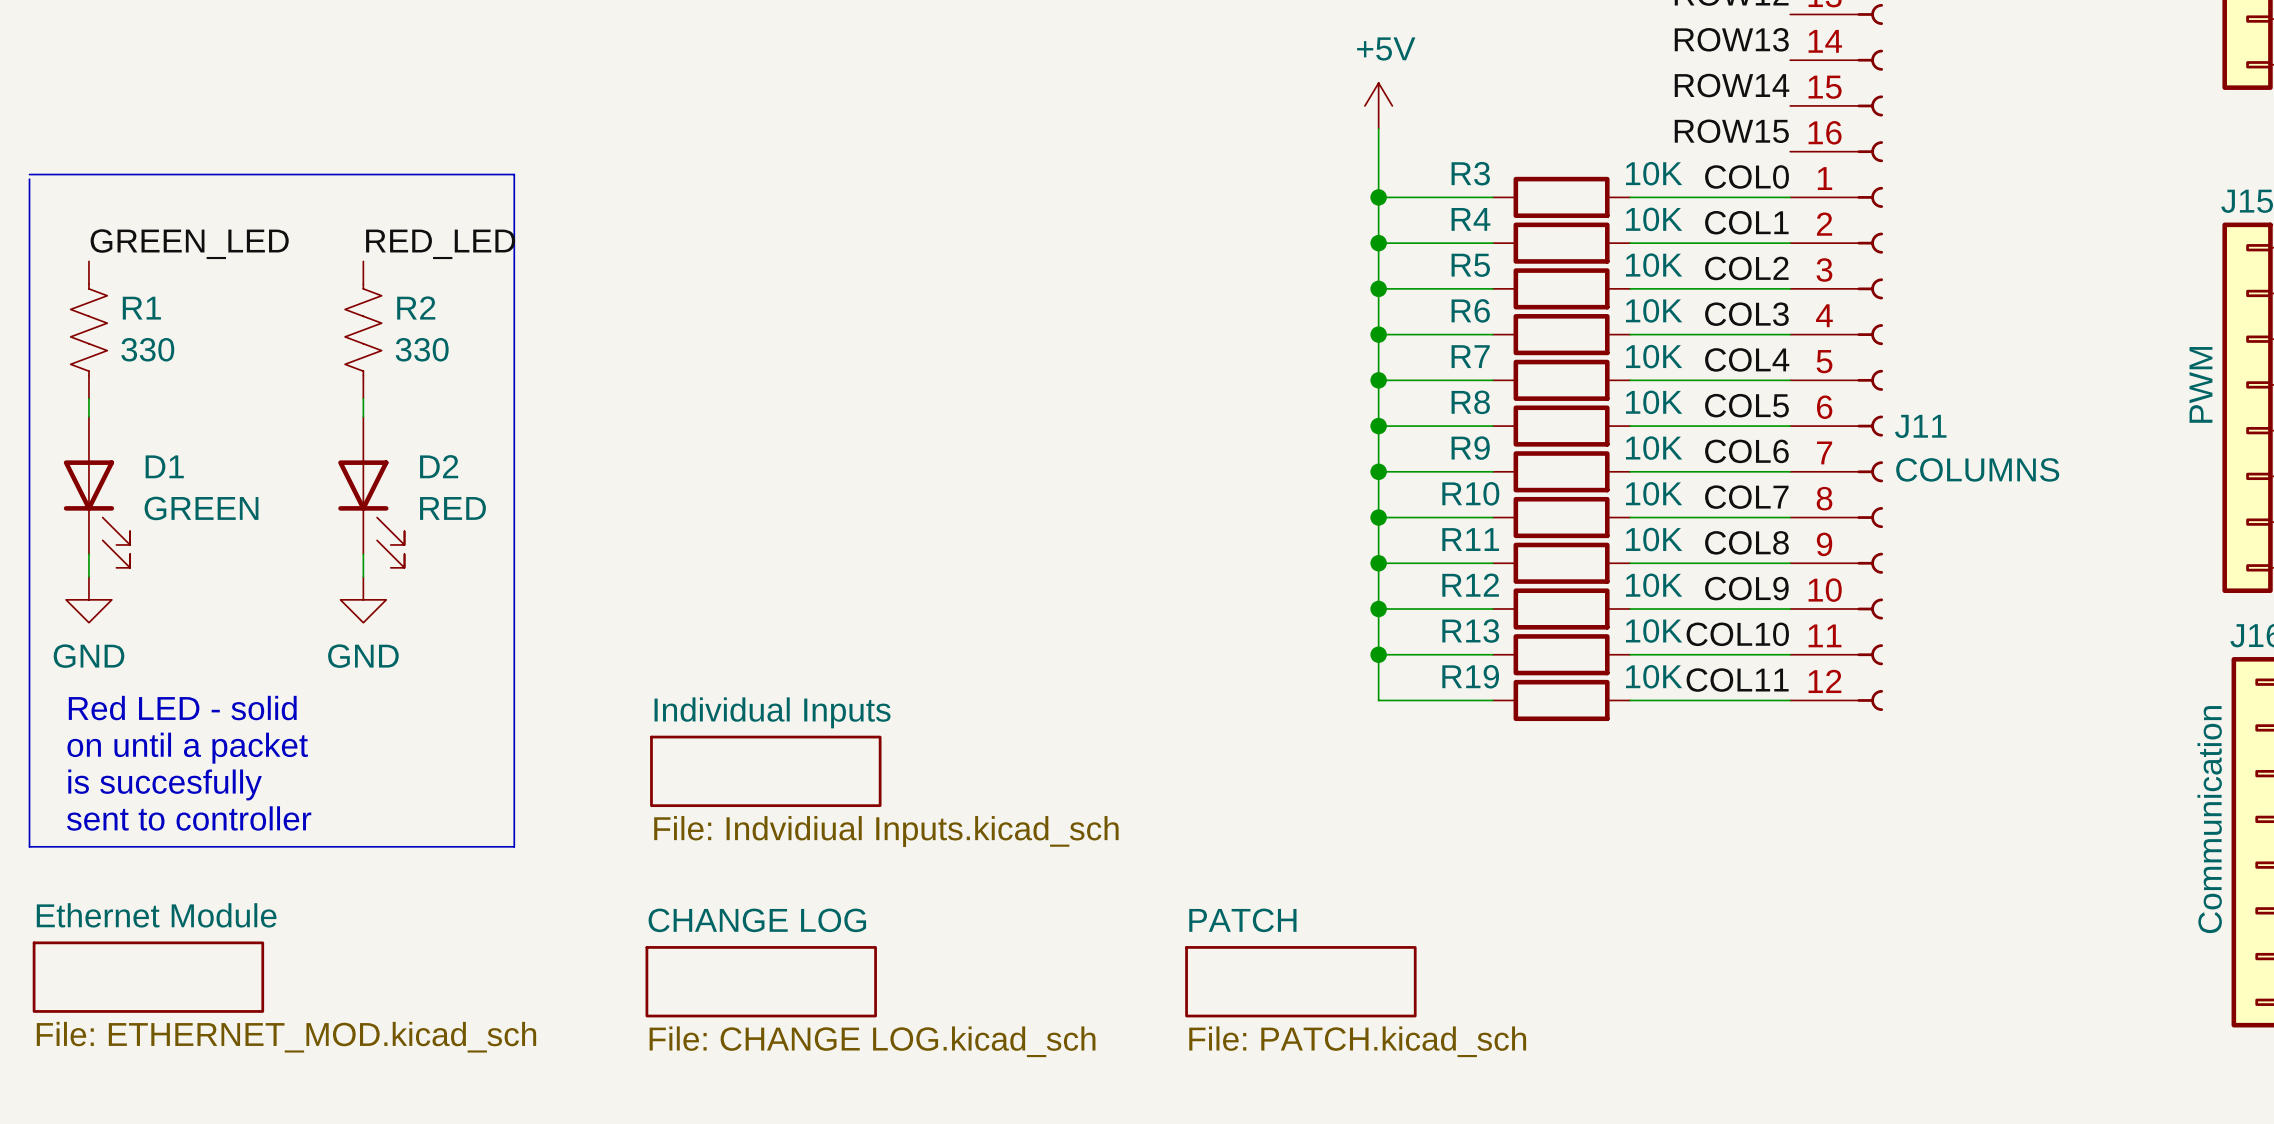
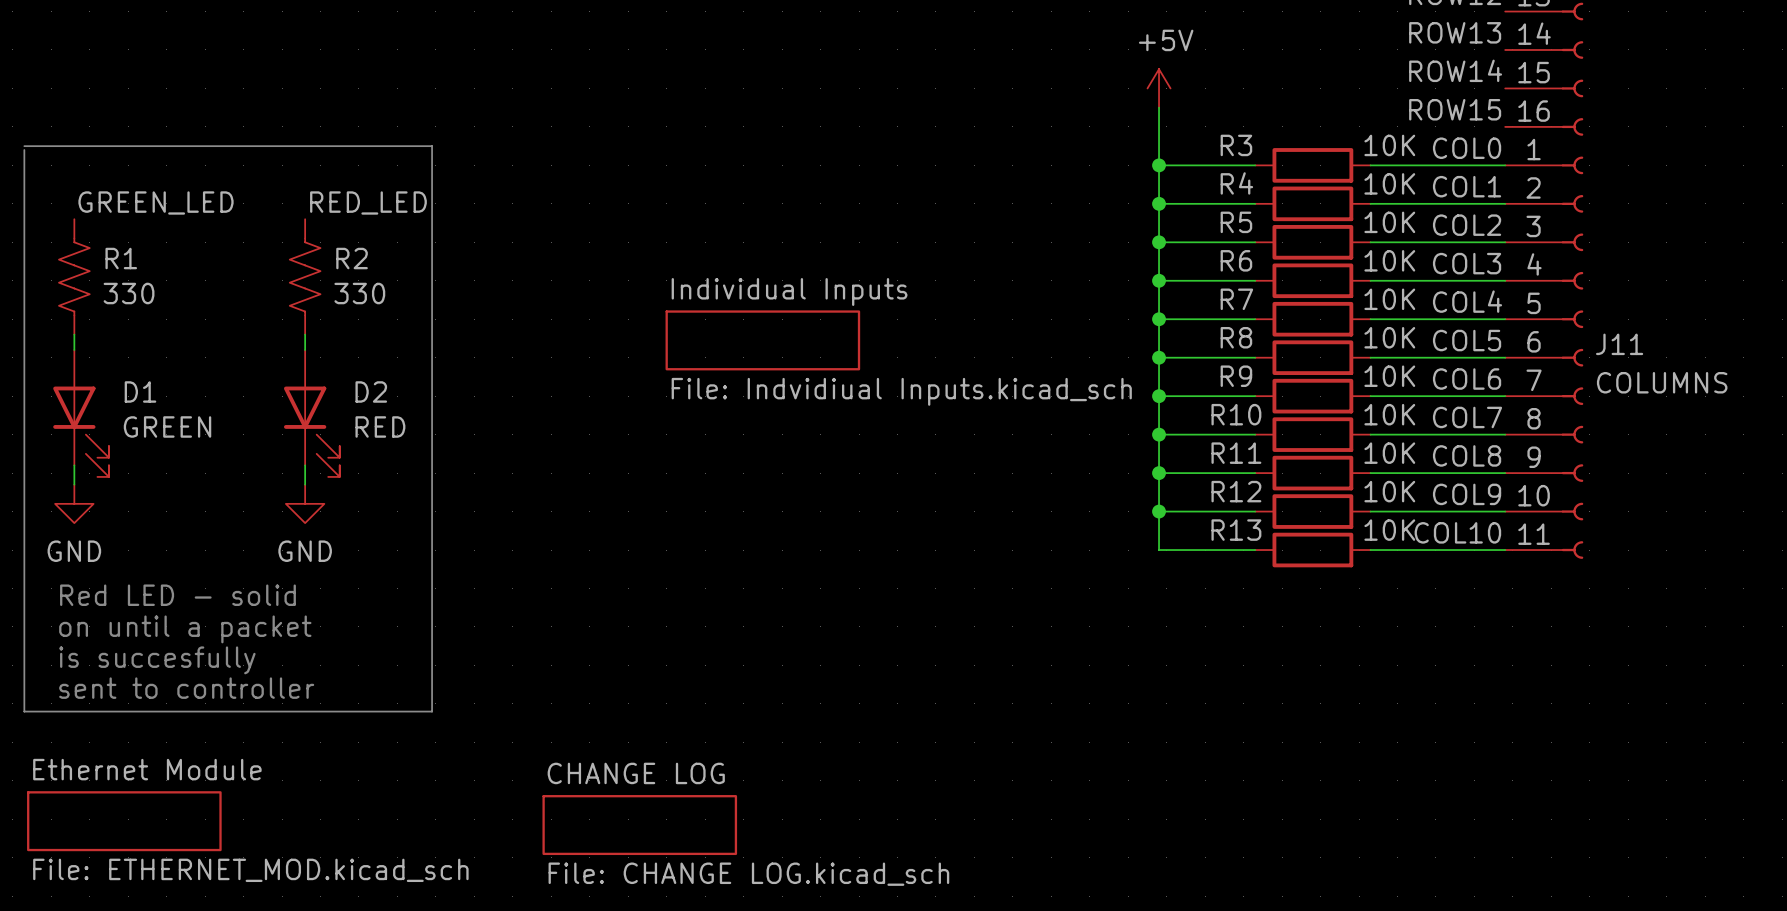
J11 symbol: [1790, 186, 1884, 711] -> [1505, 156, 1584, 559]
wire: (1378, 654) (1378, 700) (1492, 700) -> none
junction: (1378, 654) -> none
label: COL11 (1737, 680) -> none
R19: 10K (1561, 700) -> none
wire: (1630, 700) (1790, 700) -> none
sheet Individual Inputs position: (765, 771) -> (762, 340)
sheet PATCH: File: PATCH.kicad_sch (1300, 981) -> none

